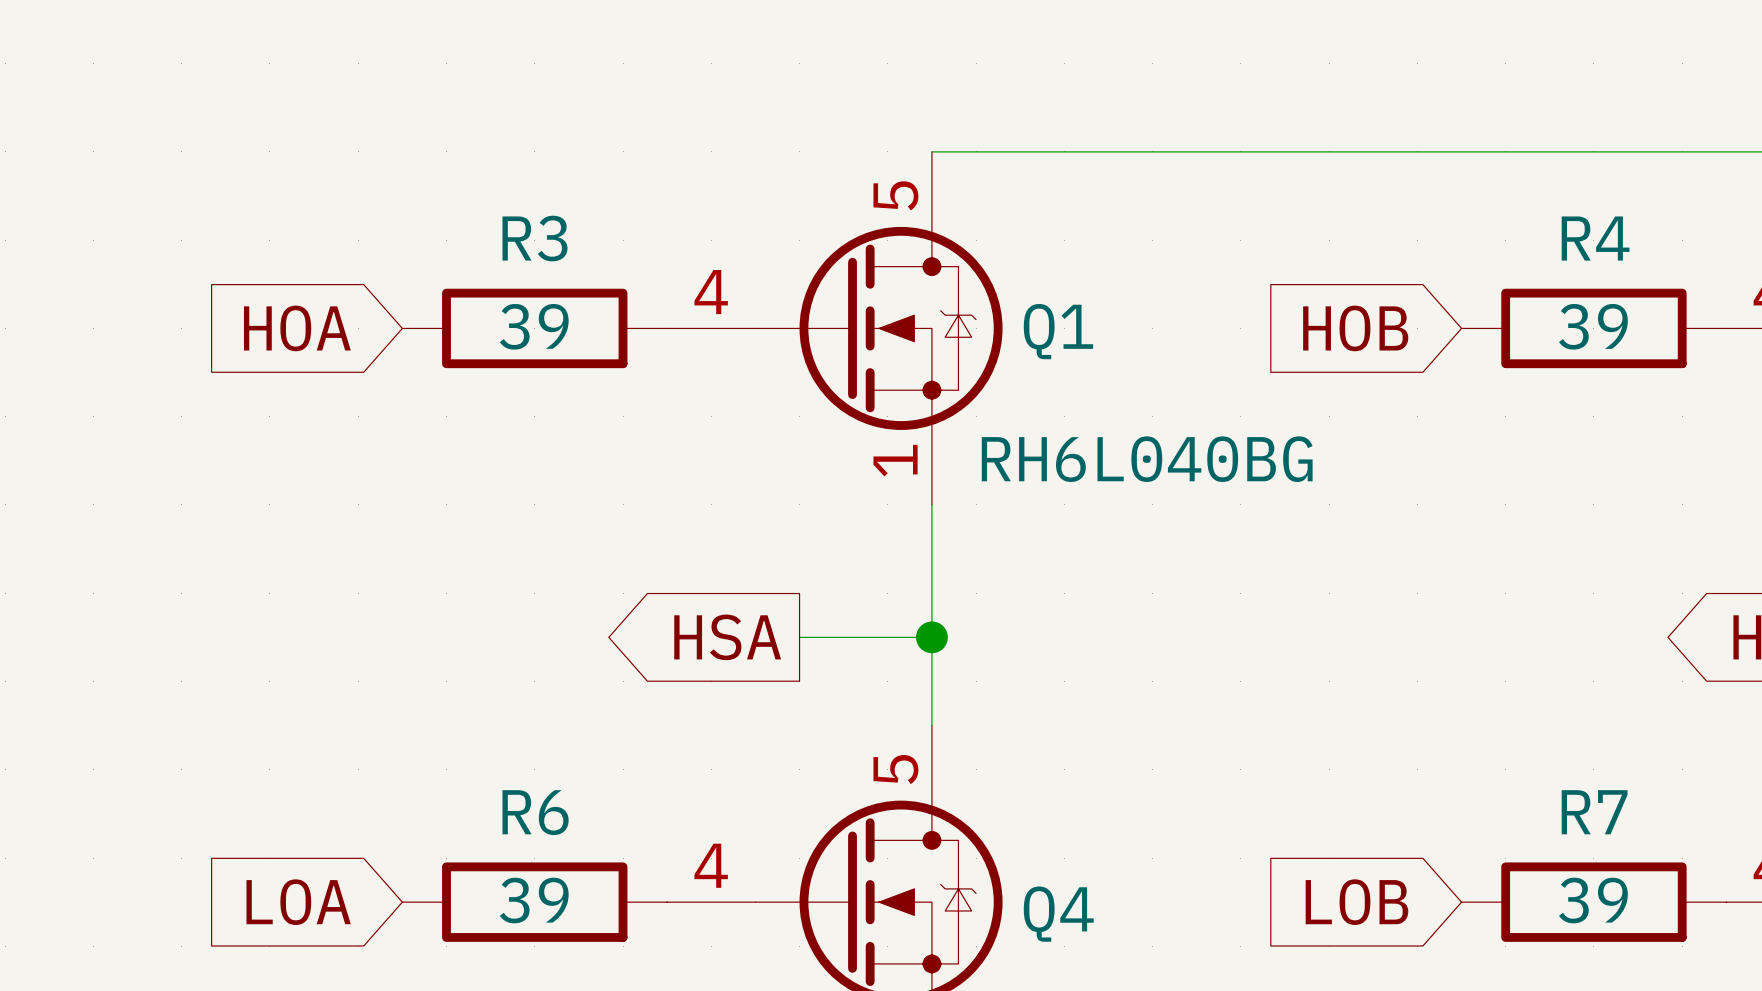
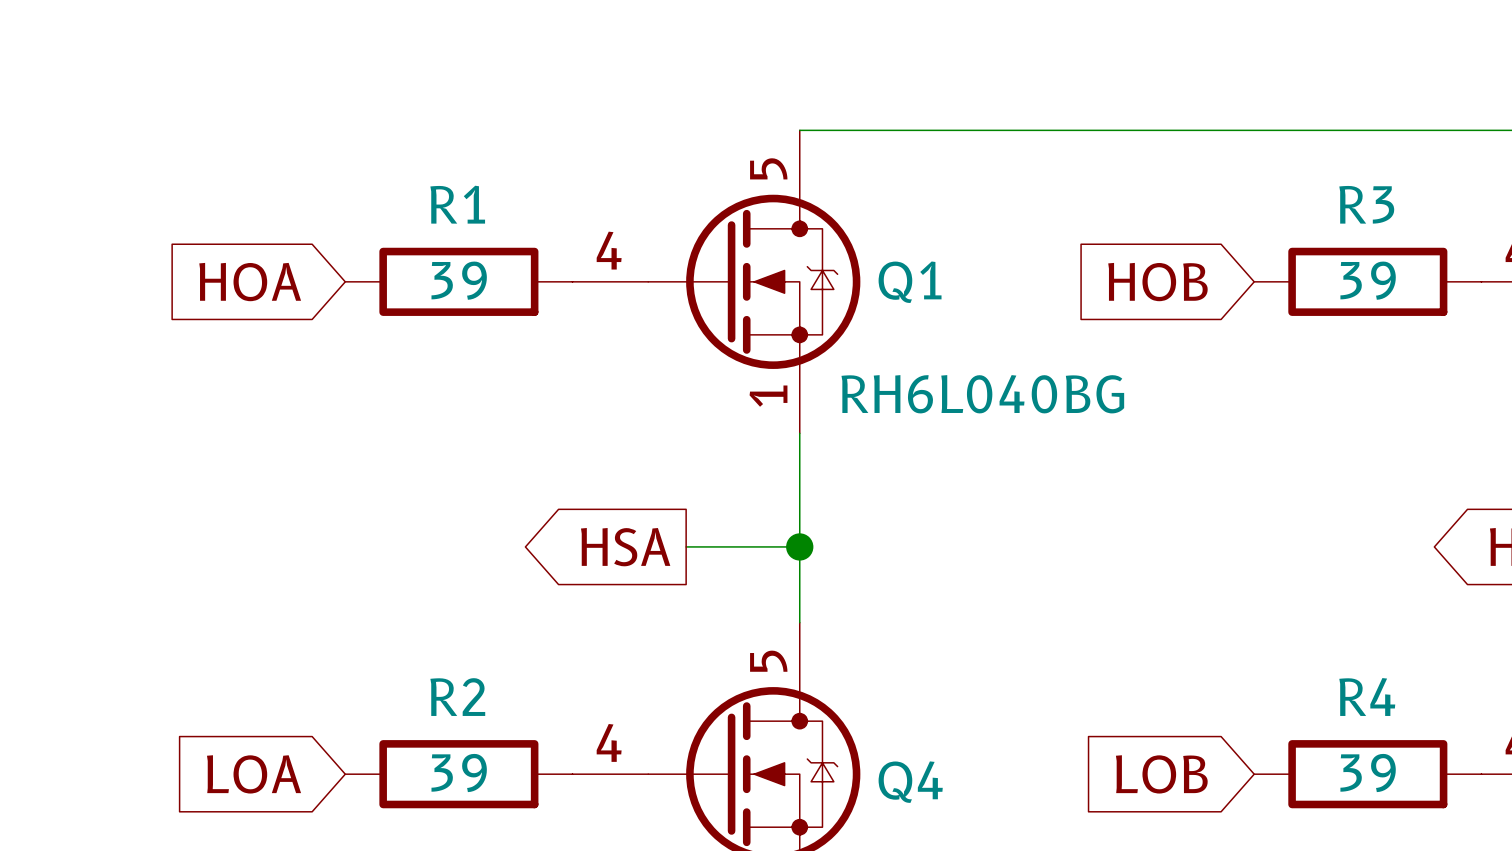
R3 name: R3 (535, 238) -> R1 (457, 204)
R4 name: R4 (1595, 238) -> R3 (1366, 204)
R6 name: R6 (535, 812) -> R2 (457, 697)
R7 name: R7 (1594, 812) -> R4 (1367, 697)

